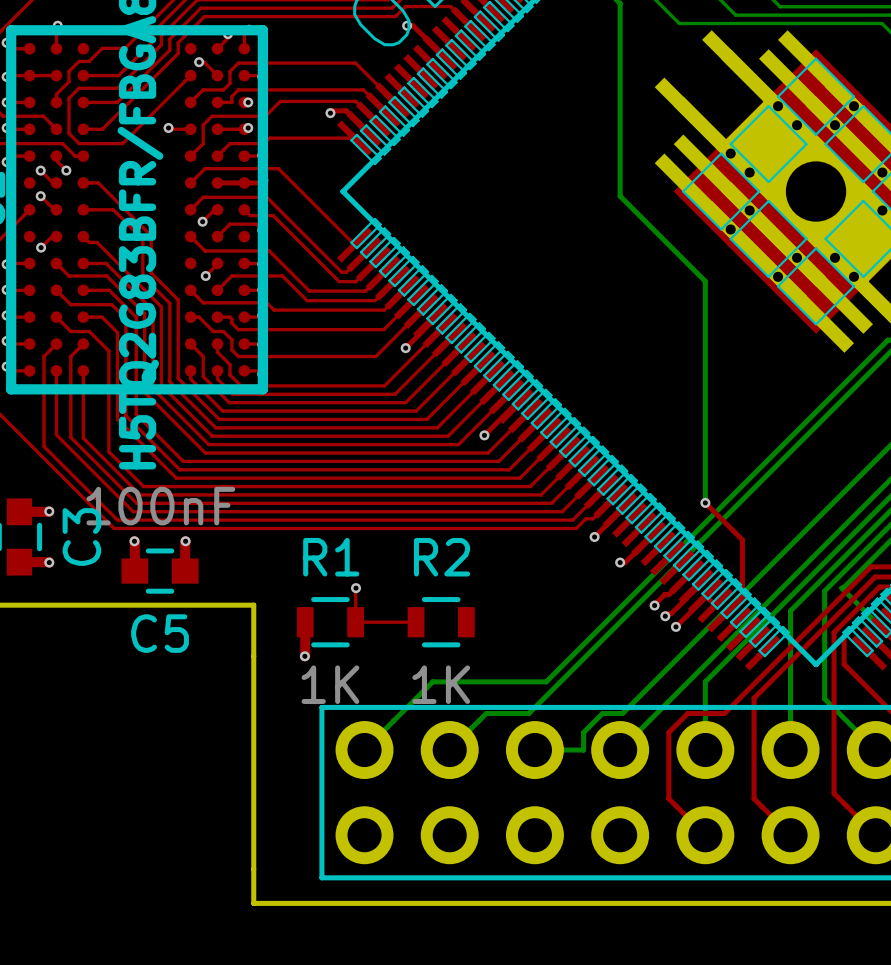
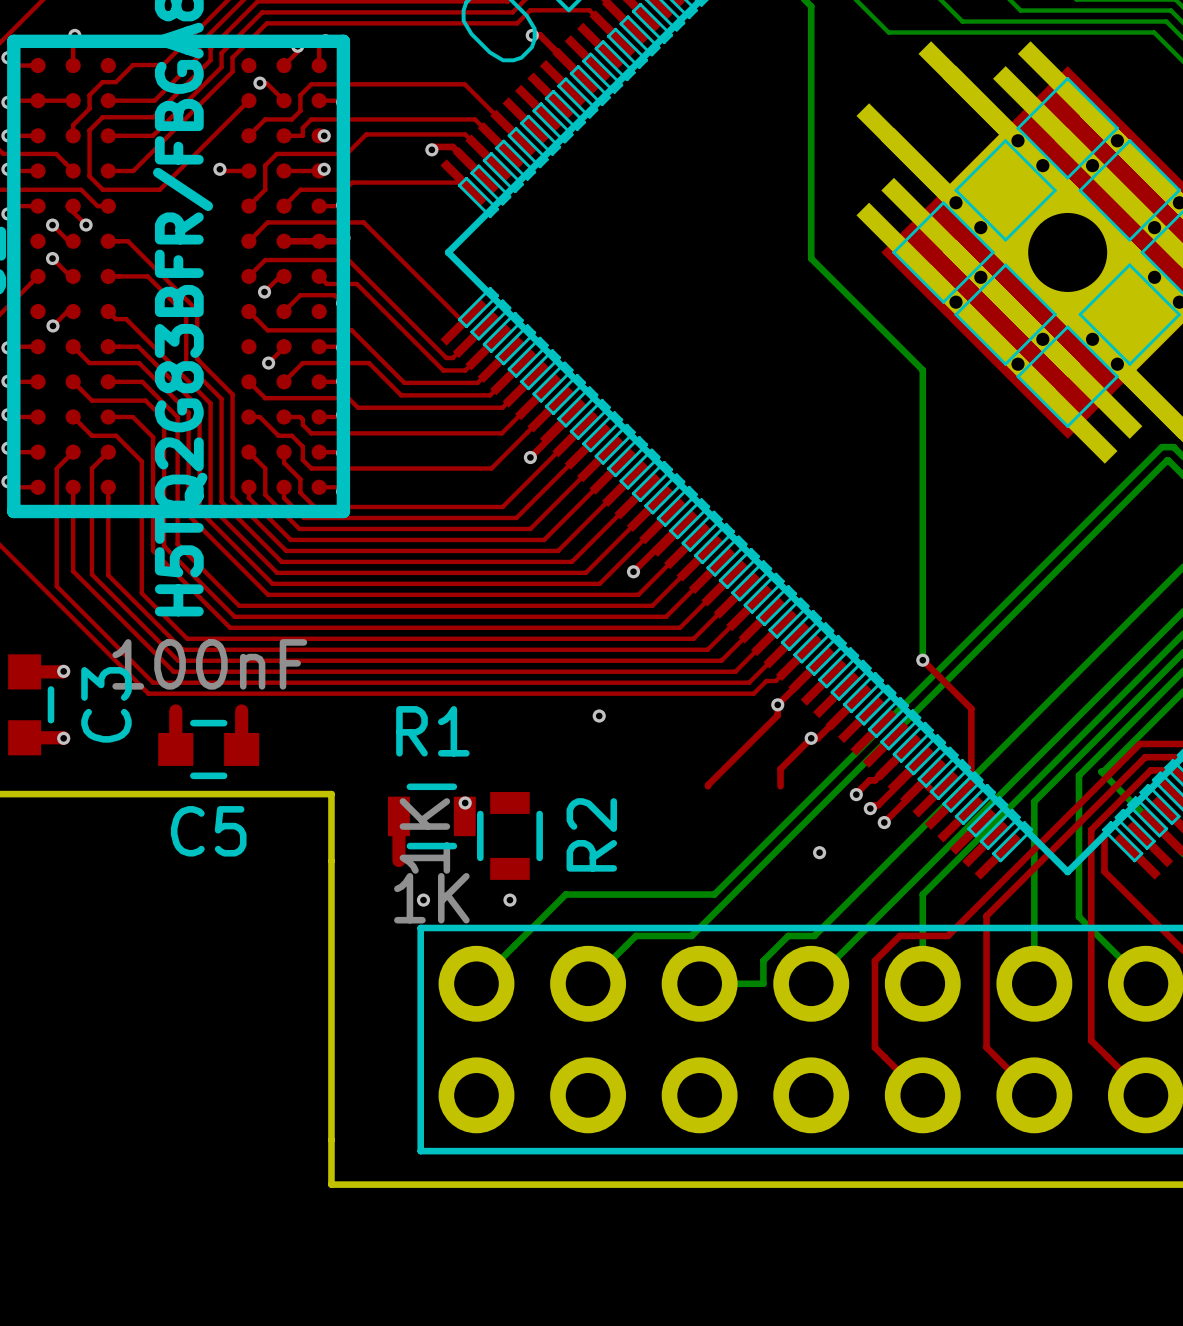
top track: none -> (777, 704) (777, 715) (708, 786)
via: (134, 541) -> none
via: (185, 541) -> none
via: none -> (599, 716)
top track: none -> (811, 738) (780, 769) (780, 786)
top track: (355, 588) (355, 622) (416, 622) -> none
via position: (356, 588) -> (465, 803)
R2 rotation: 0° (441, 622) -> 90° clockwise (509, 835)
R2 position: (441, 622) -> (509, 835)
via: none -> (819, 852)
via: (304, 656) -> none
via: none -> (423, 900)
via: none -> (509, 900)

